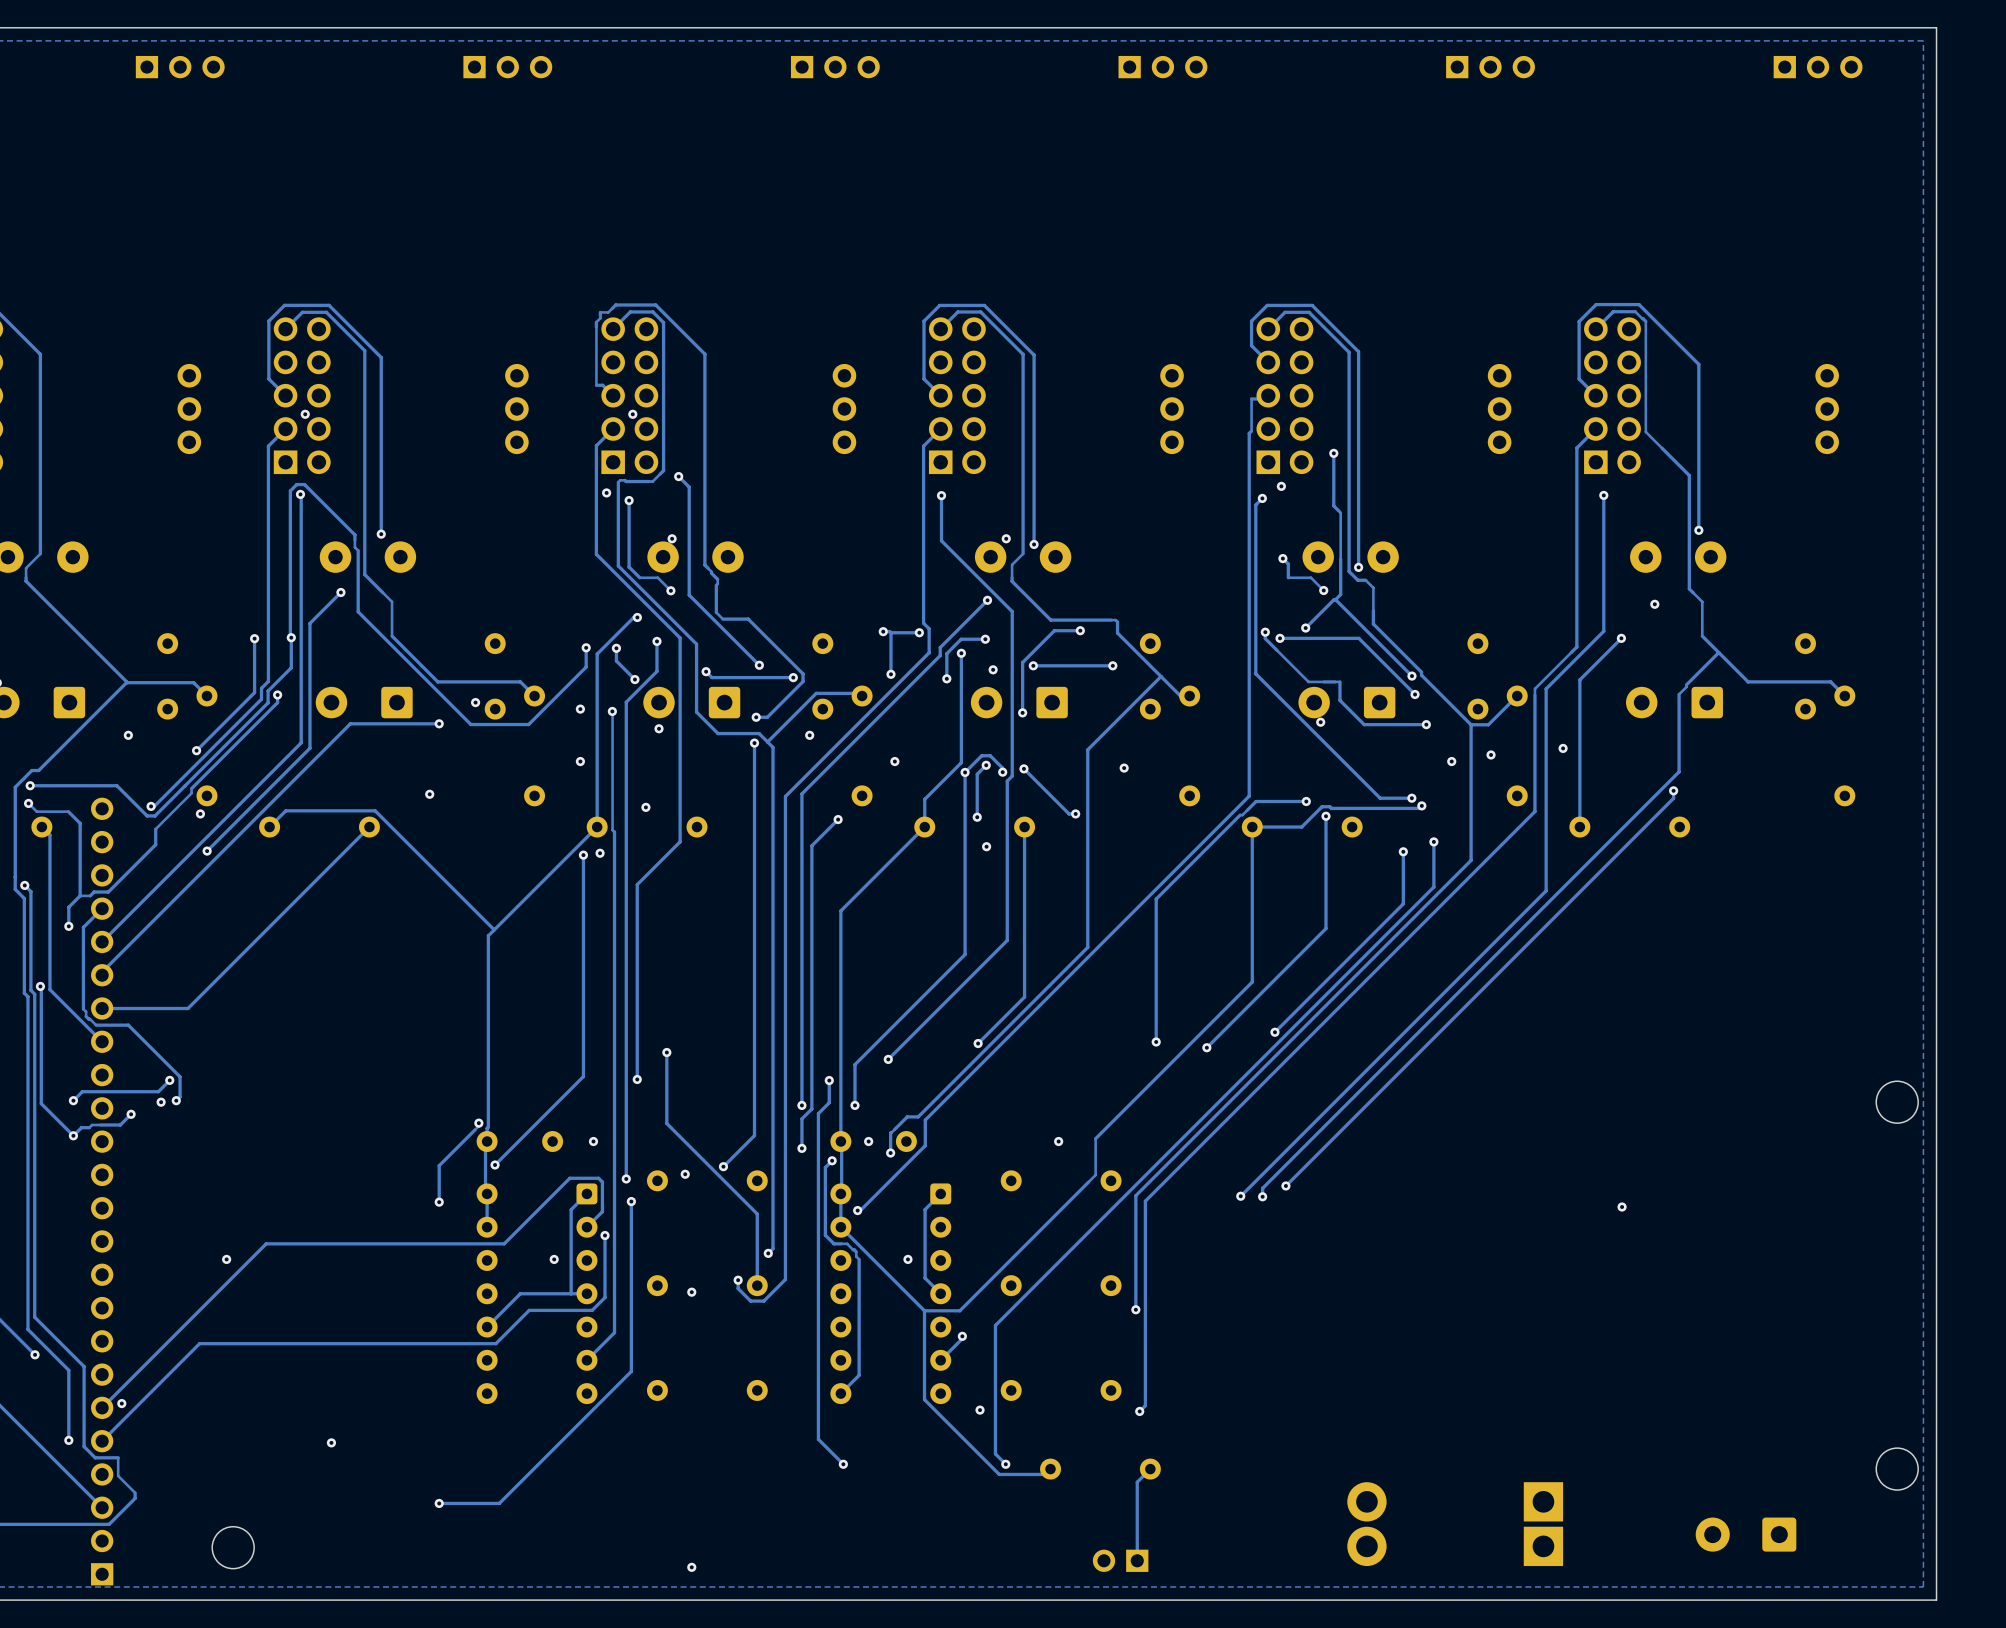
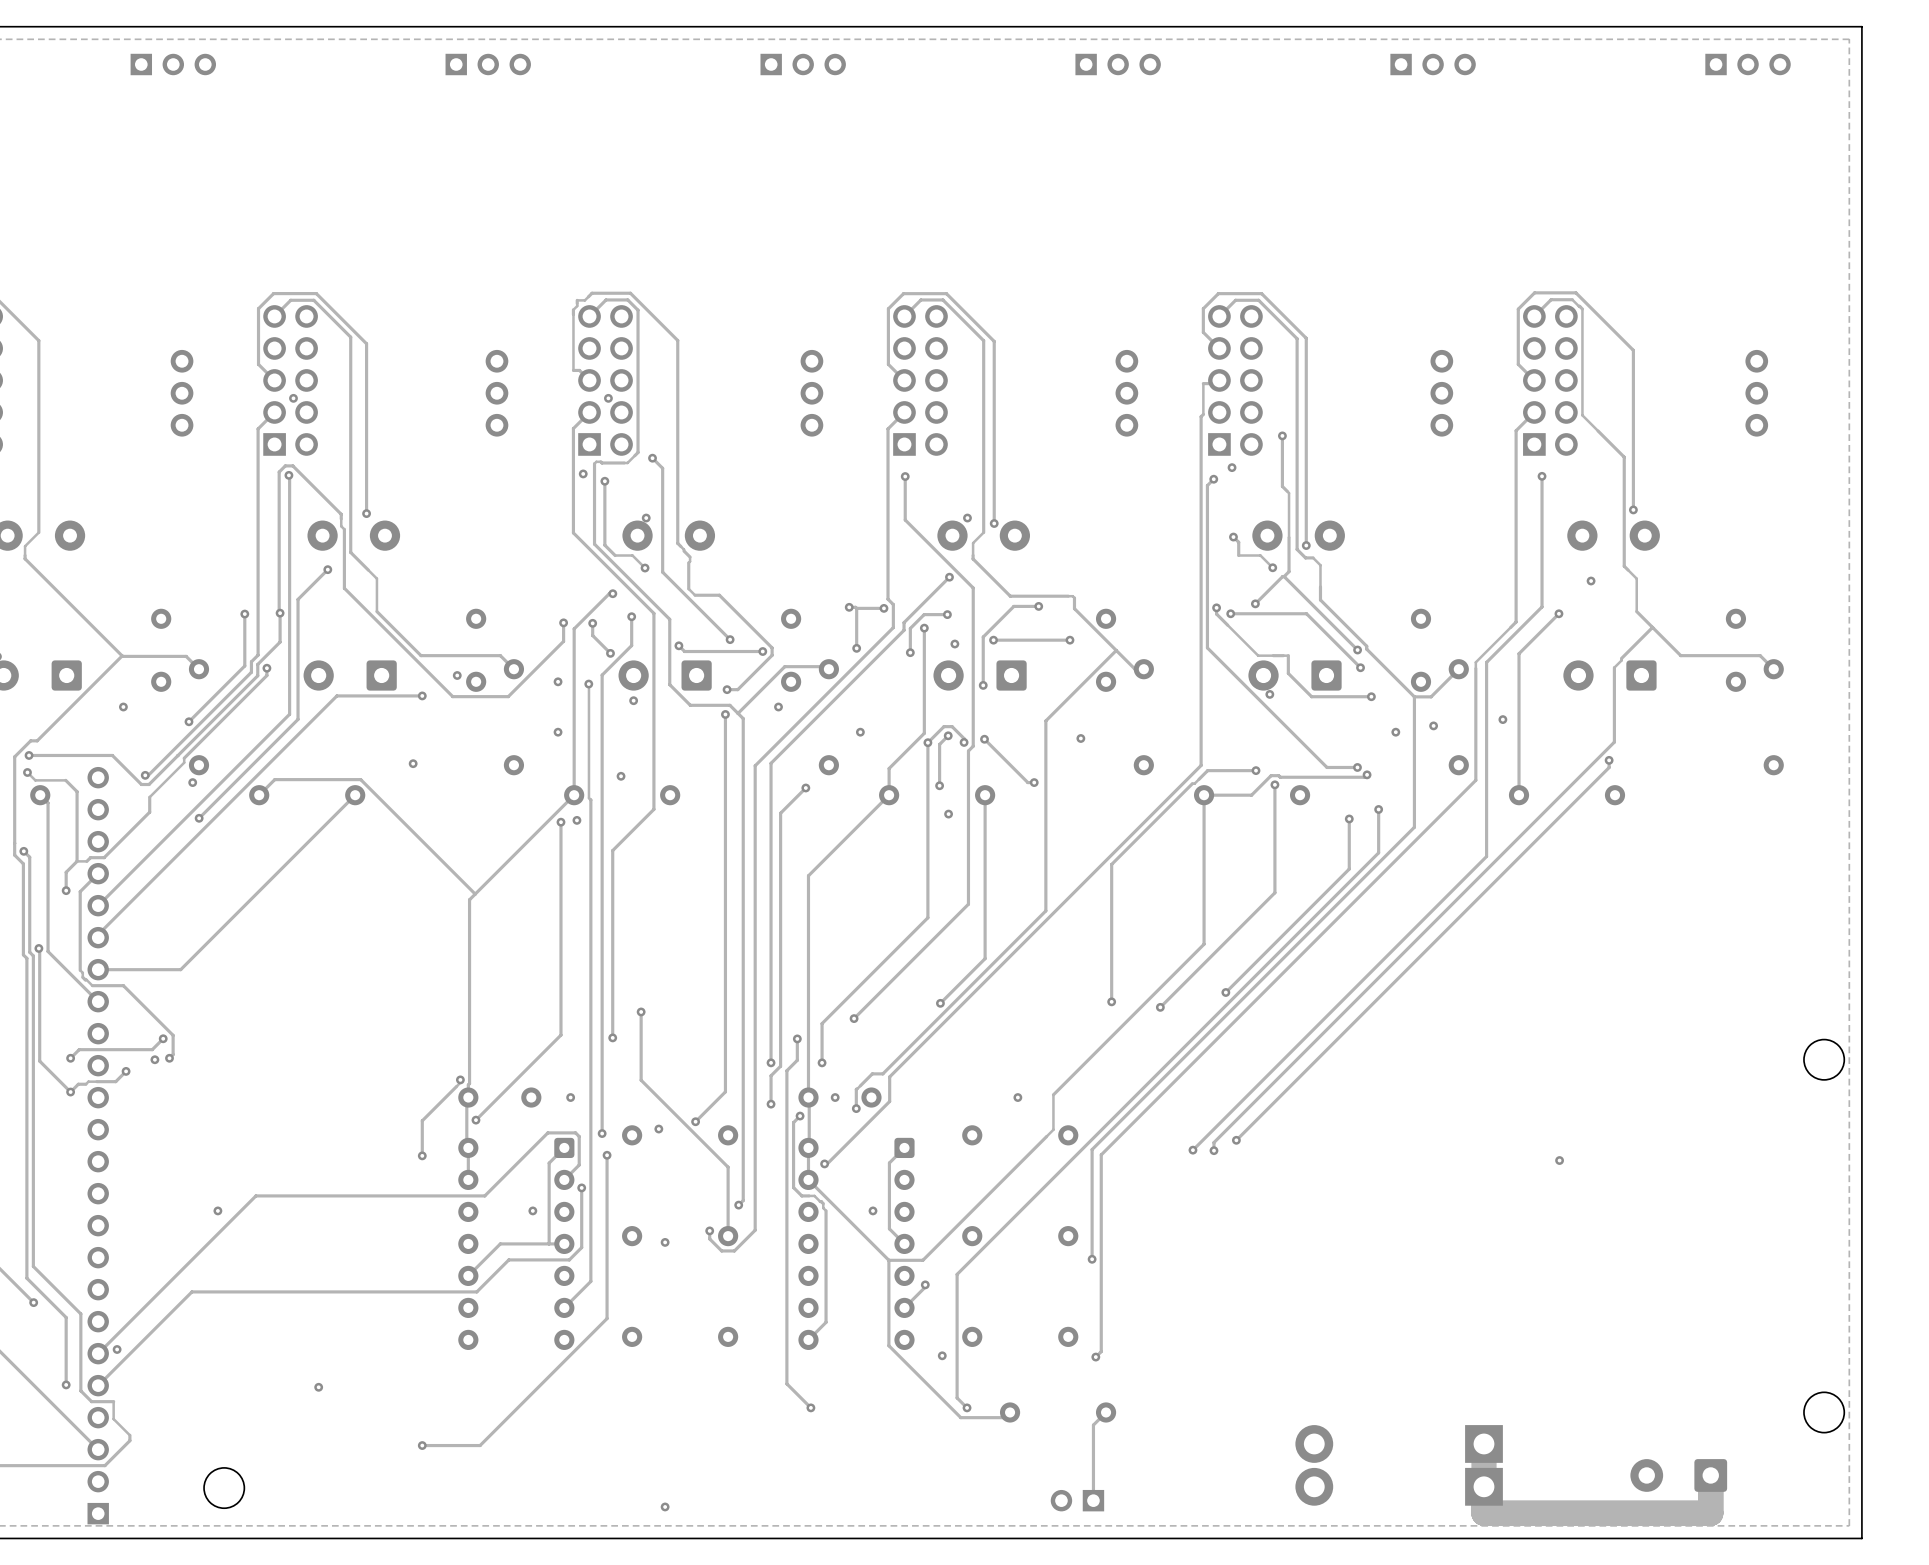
track: none -> (1483, 1443) (1483, 1513) (1710, 1513) (1710, 1475)

